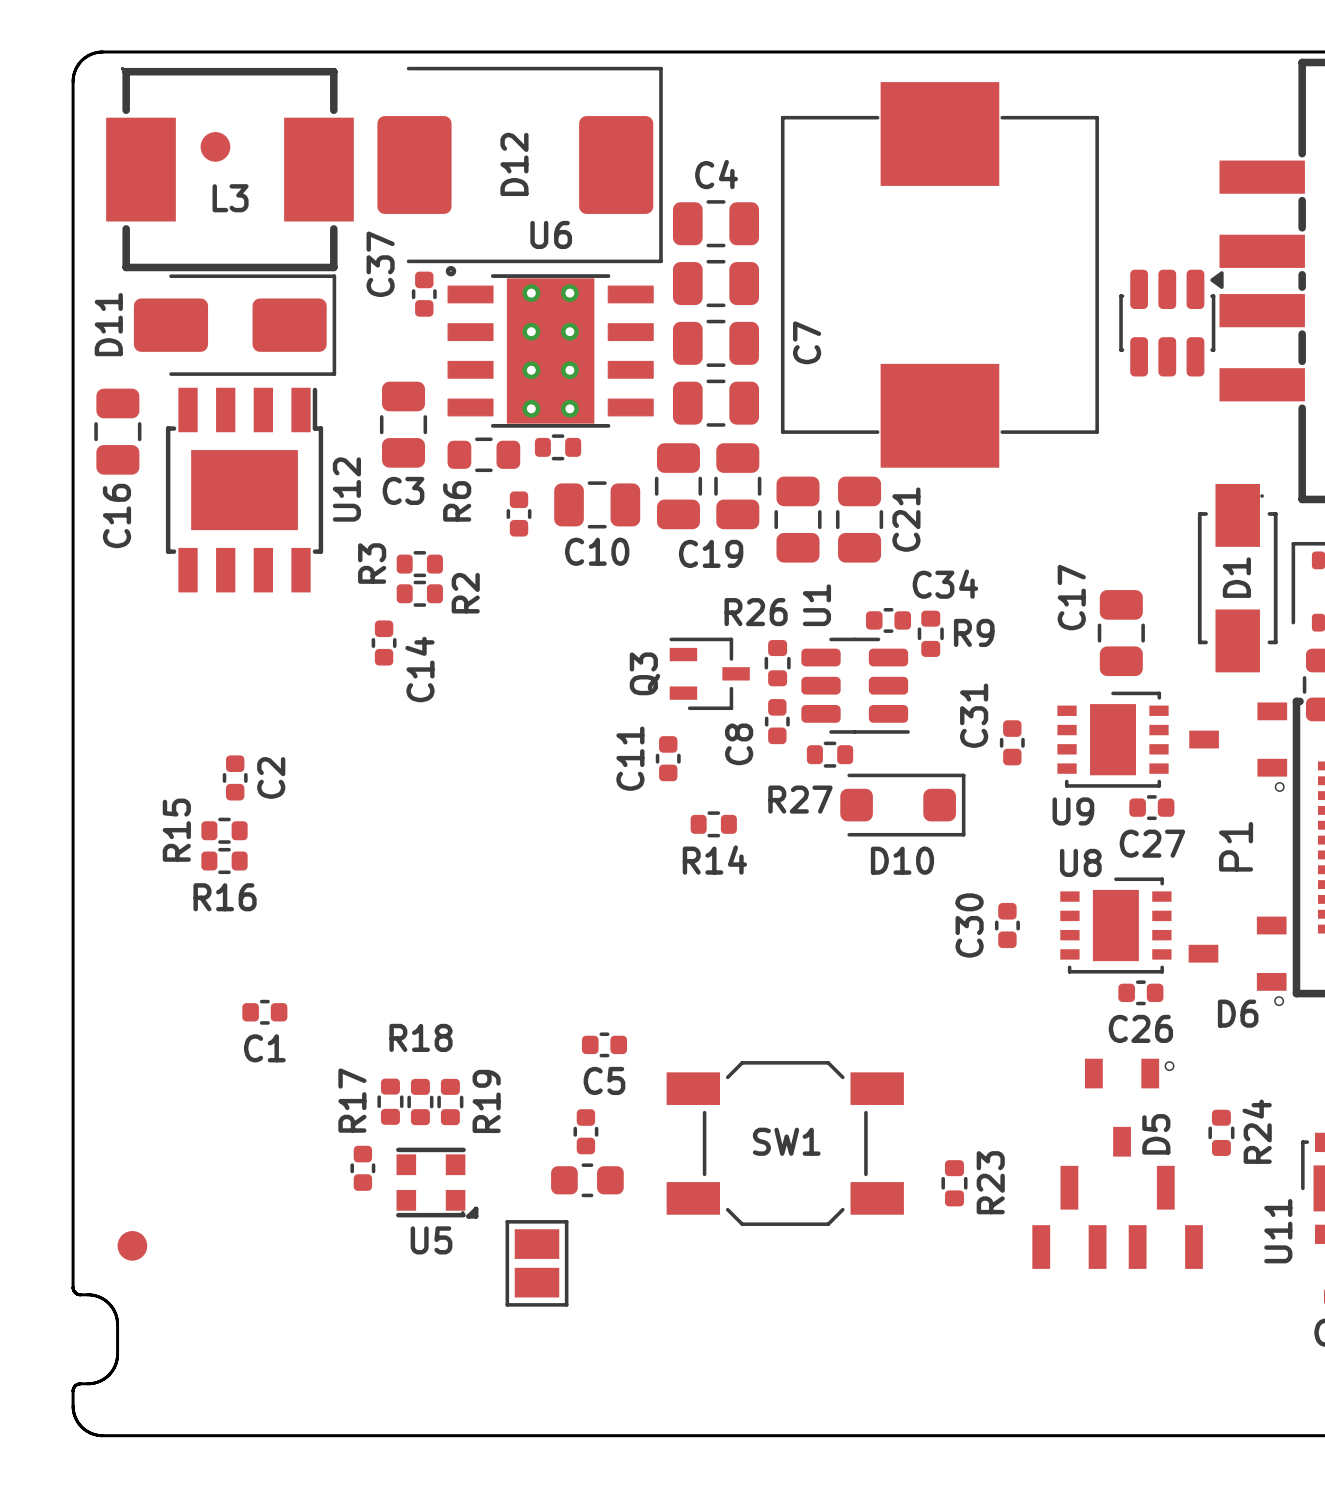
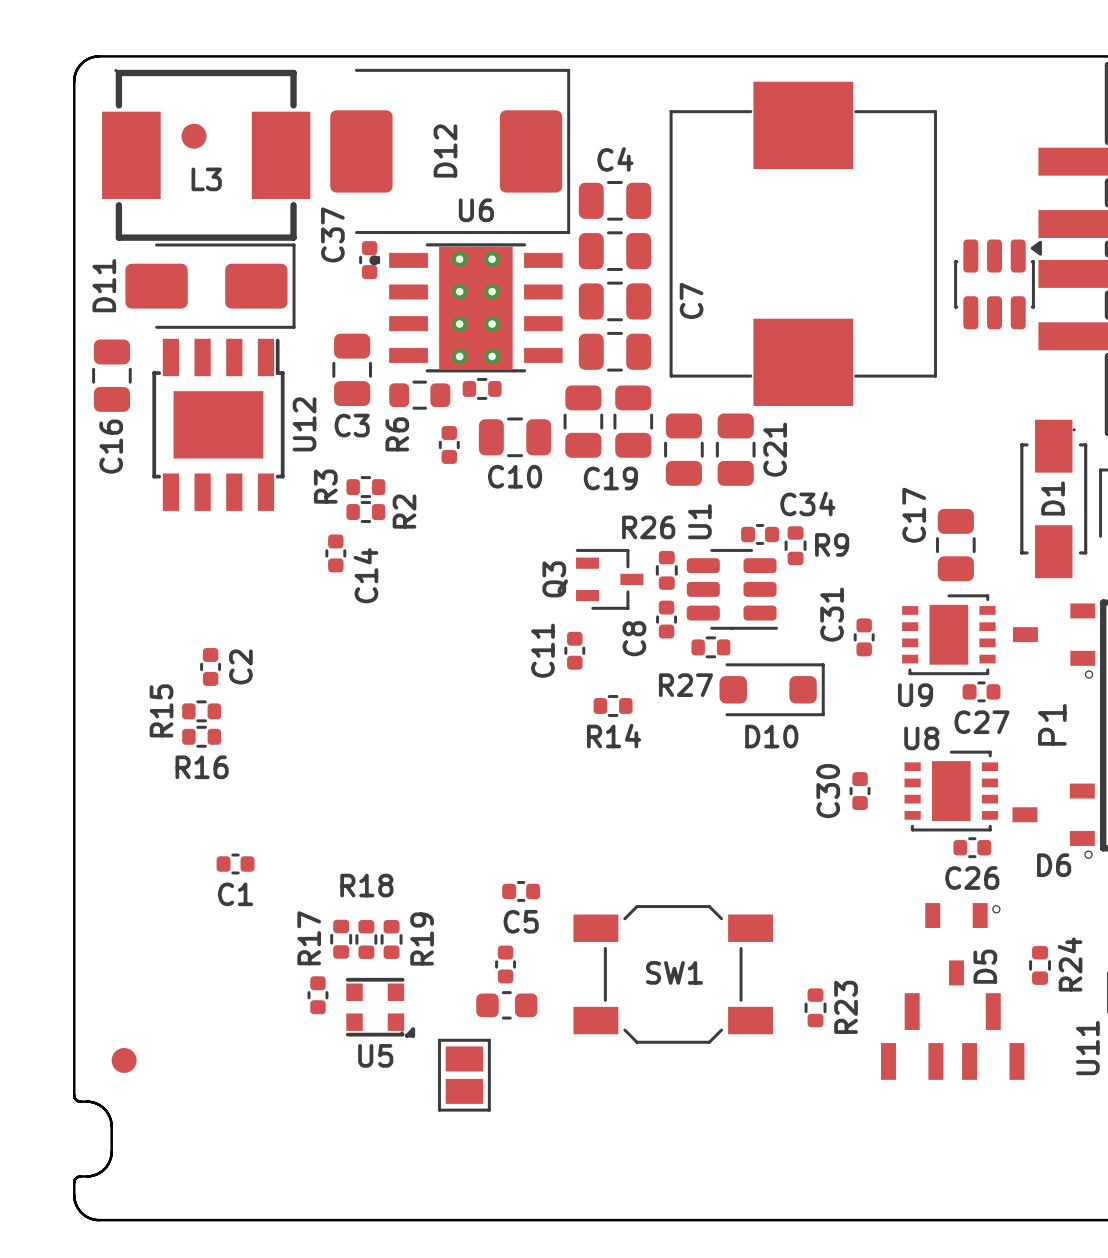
U6 footprint: [445, 265, 654, 428] -> [369, 243, 563, 373]

